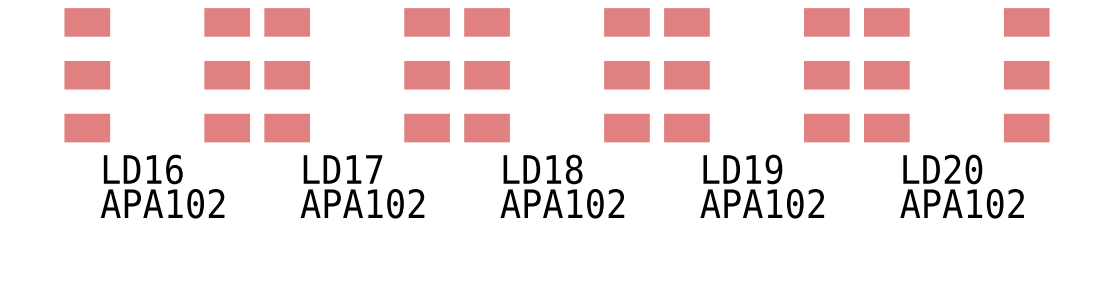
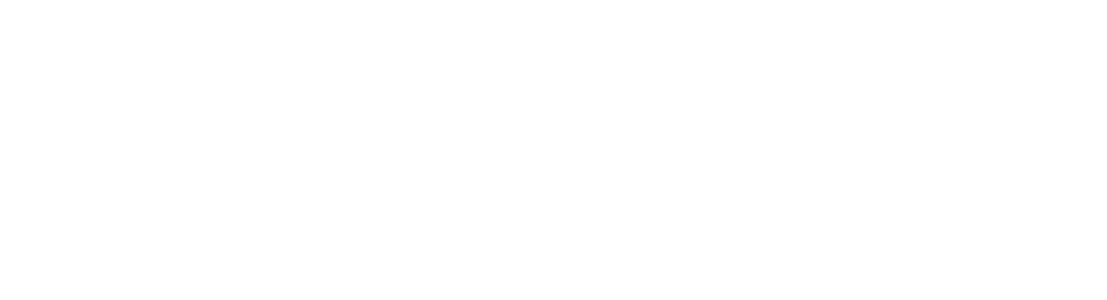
LD16: APA102 (157, 75) -> none
LD17: APA102 (357, 75) -> none
LD18: APA102 (557, 75) -> none
LD19: APA102 (756, 75) -> none
LD20: APA102 (956, 75) -> none

